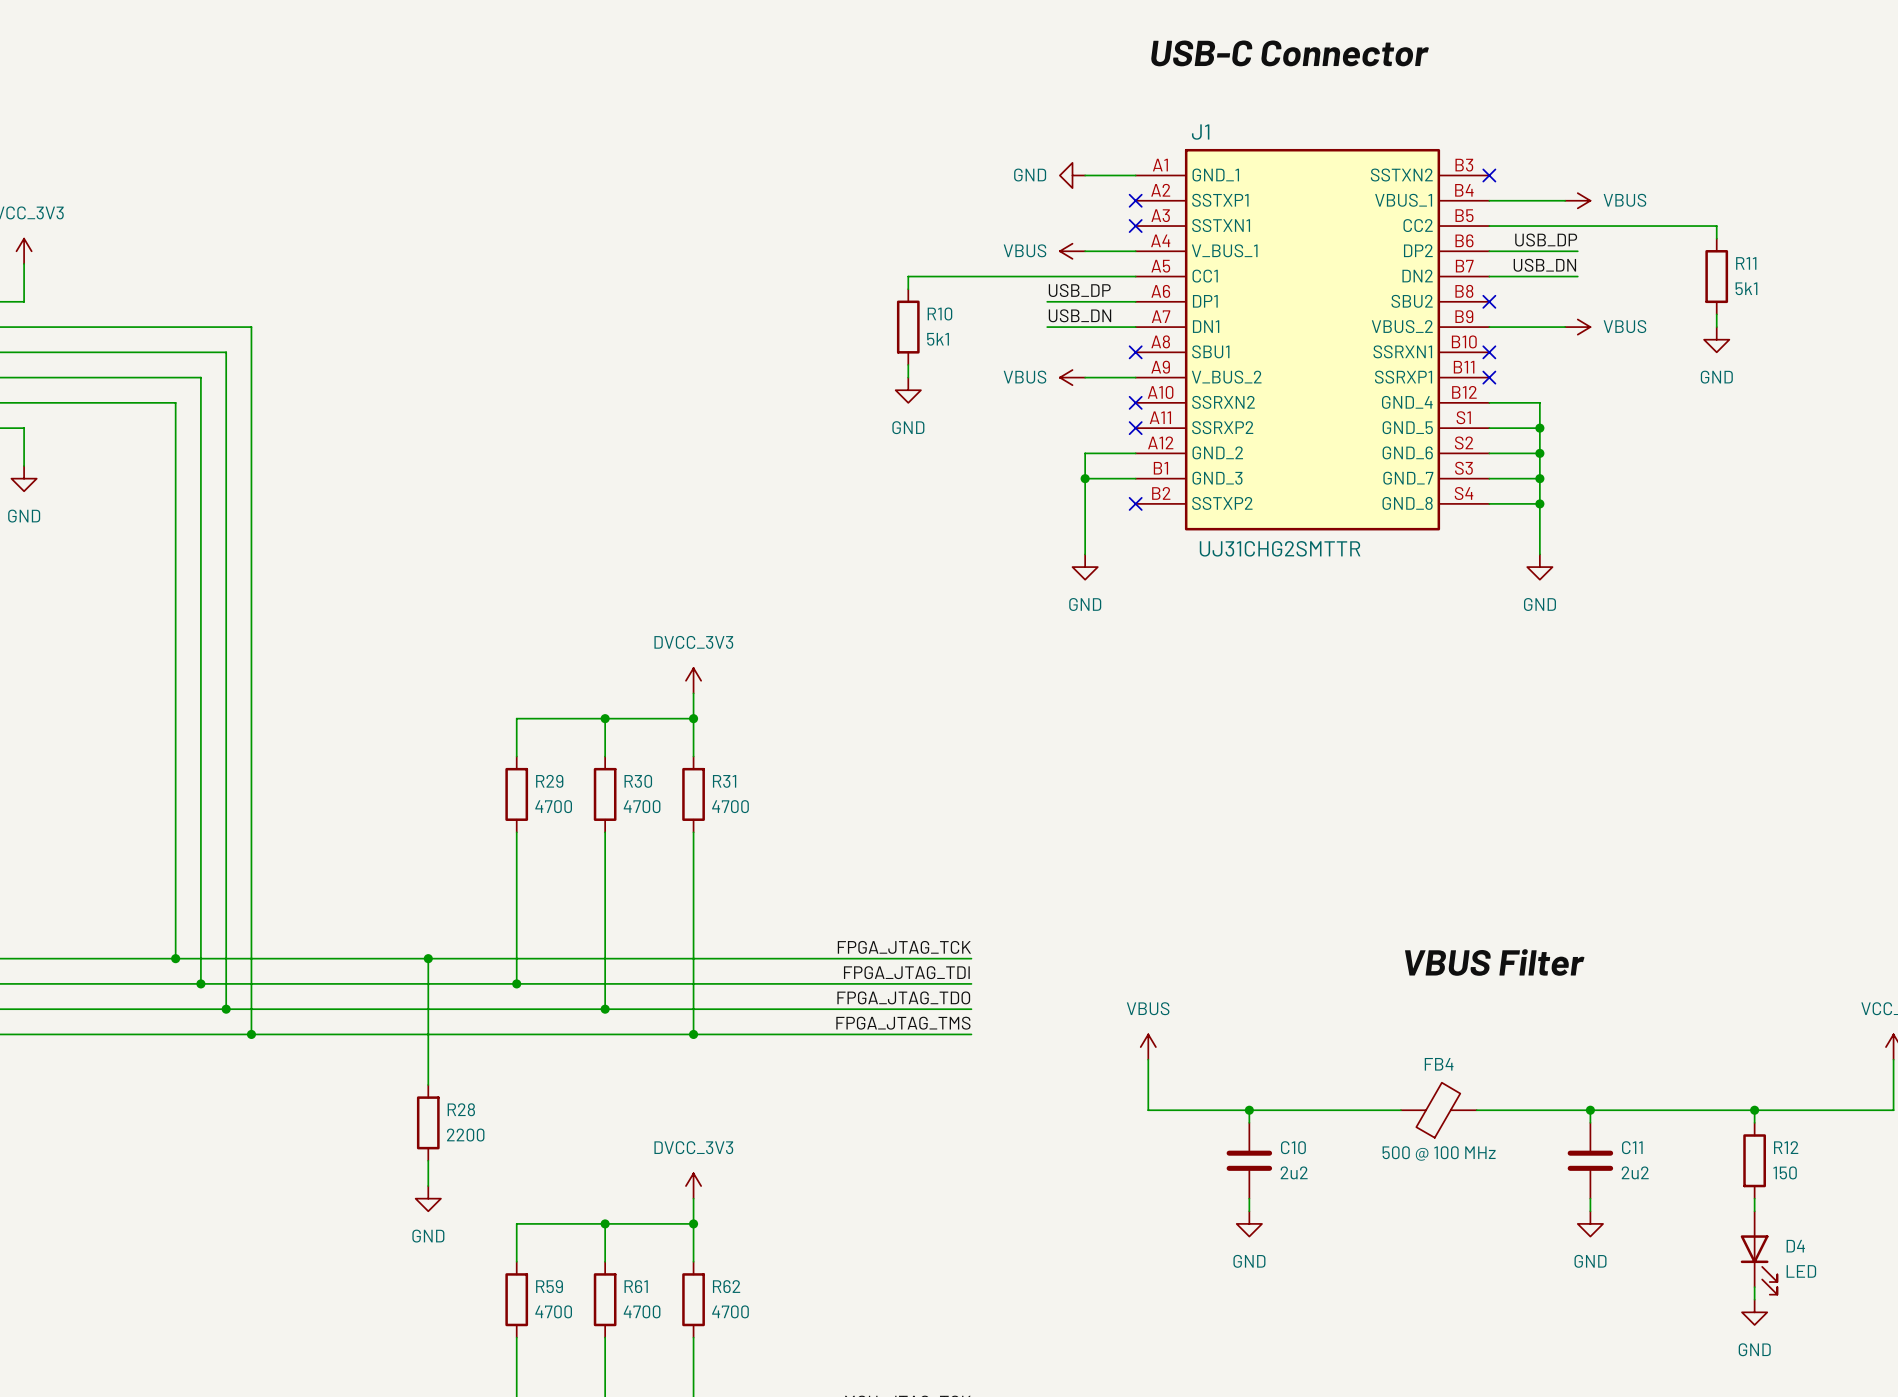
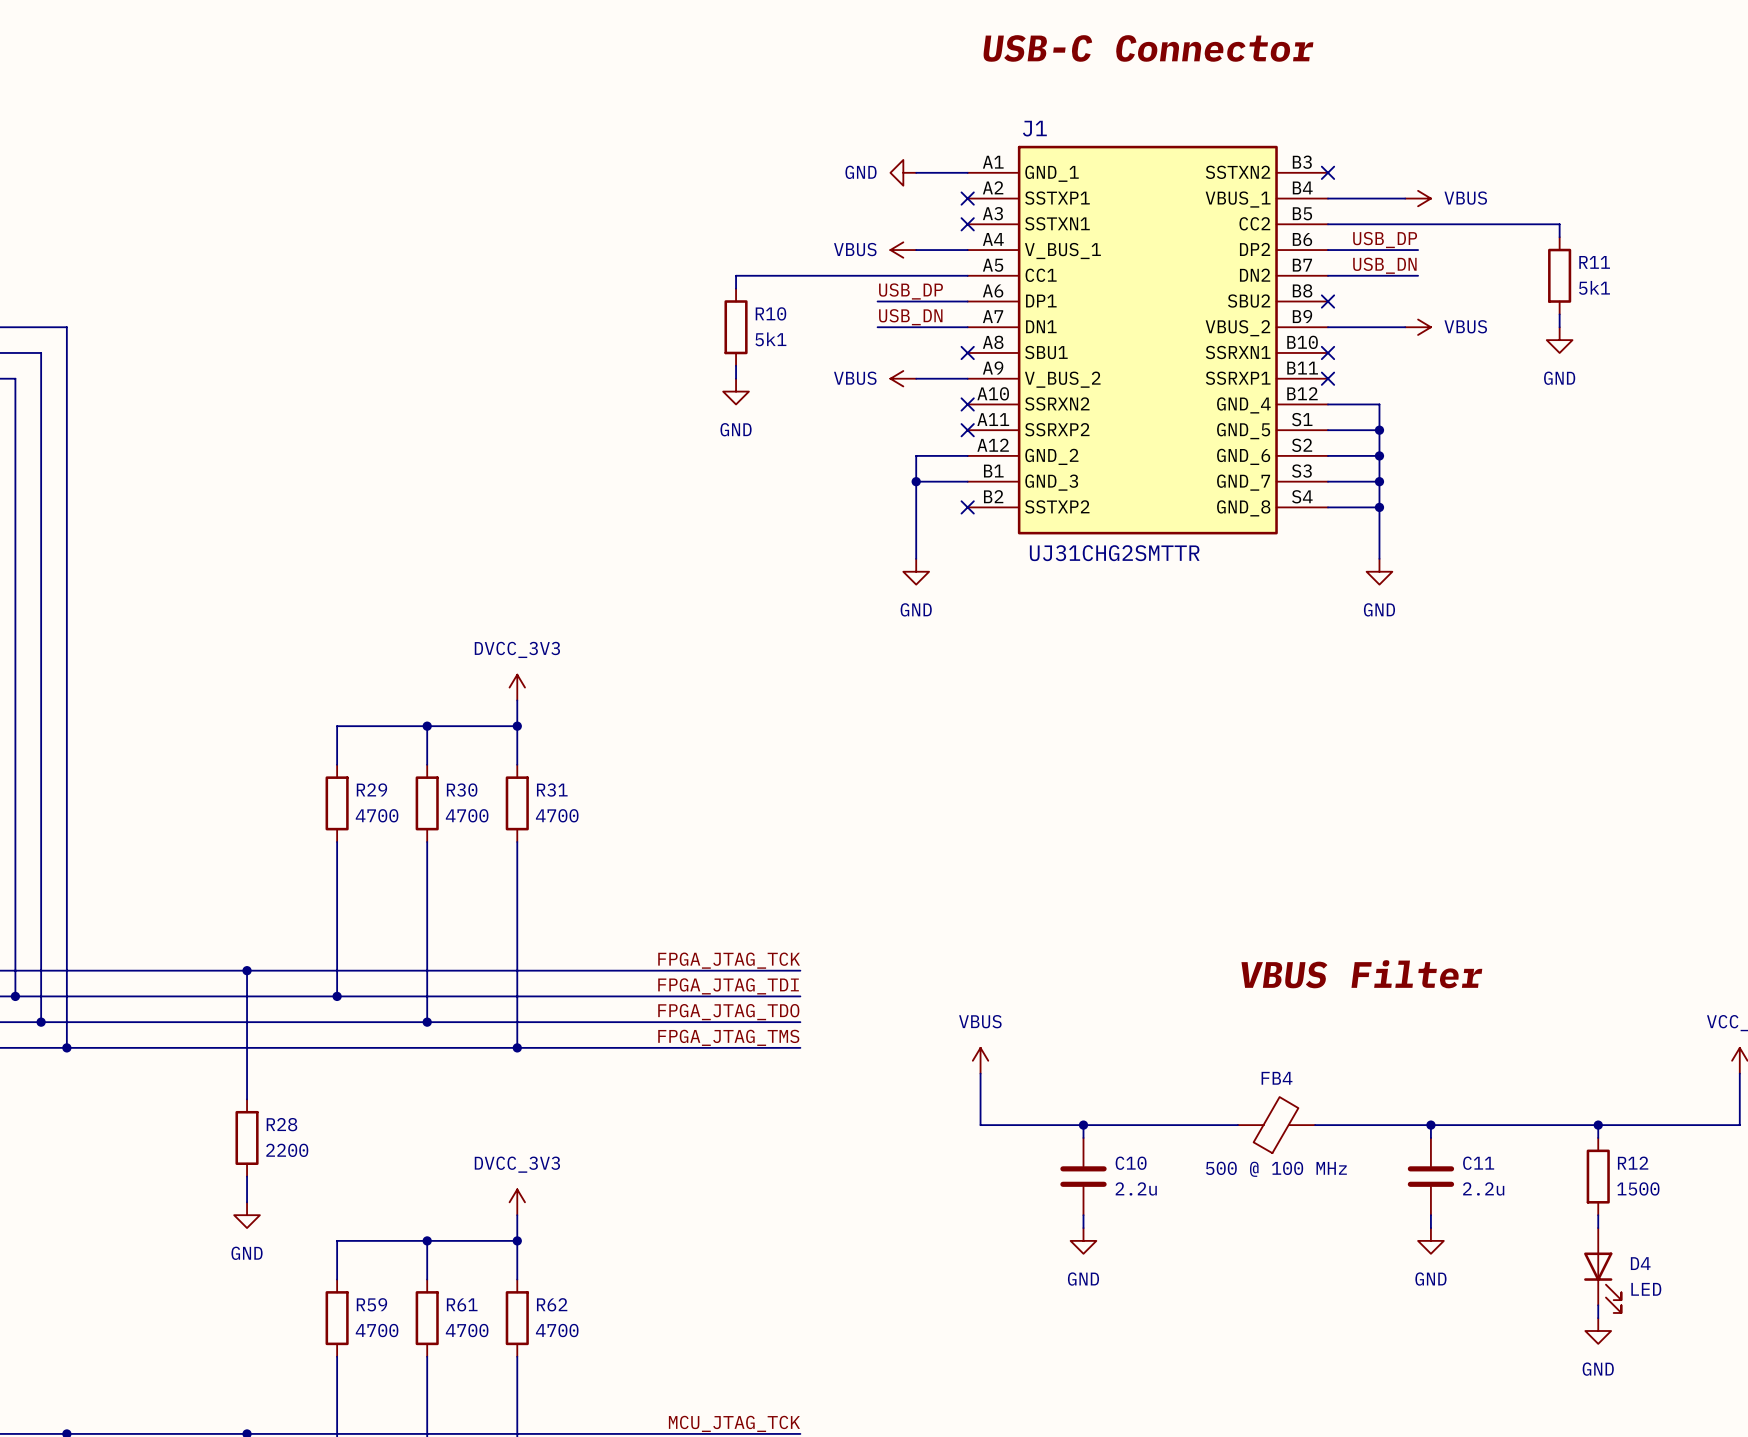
C10 value: 2u2 (1294, 1172) -> 2.2u (1136, 1188)
C11 value: 2u2 (1635, 1172) -> 2.2u (1483, 1188)
R12 value: 150 (1785, 1172) -> 1500 (1638, 1188)

